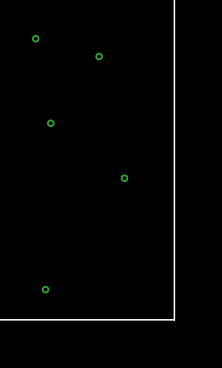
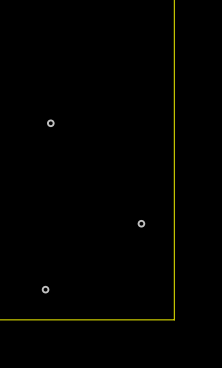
via: (35, 38) -> none
via: (99, 56) -> none
via position: (124, 178) -> (141, 223)

